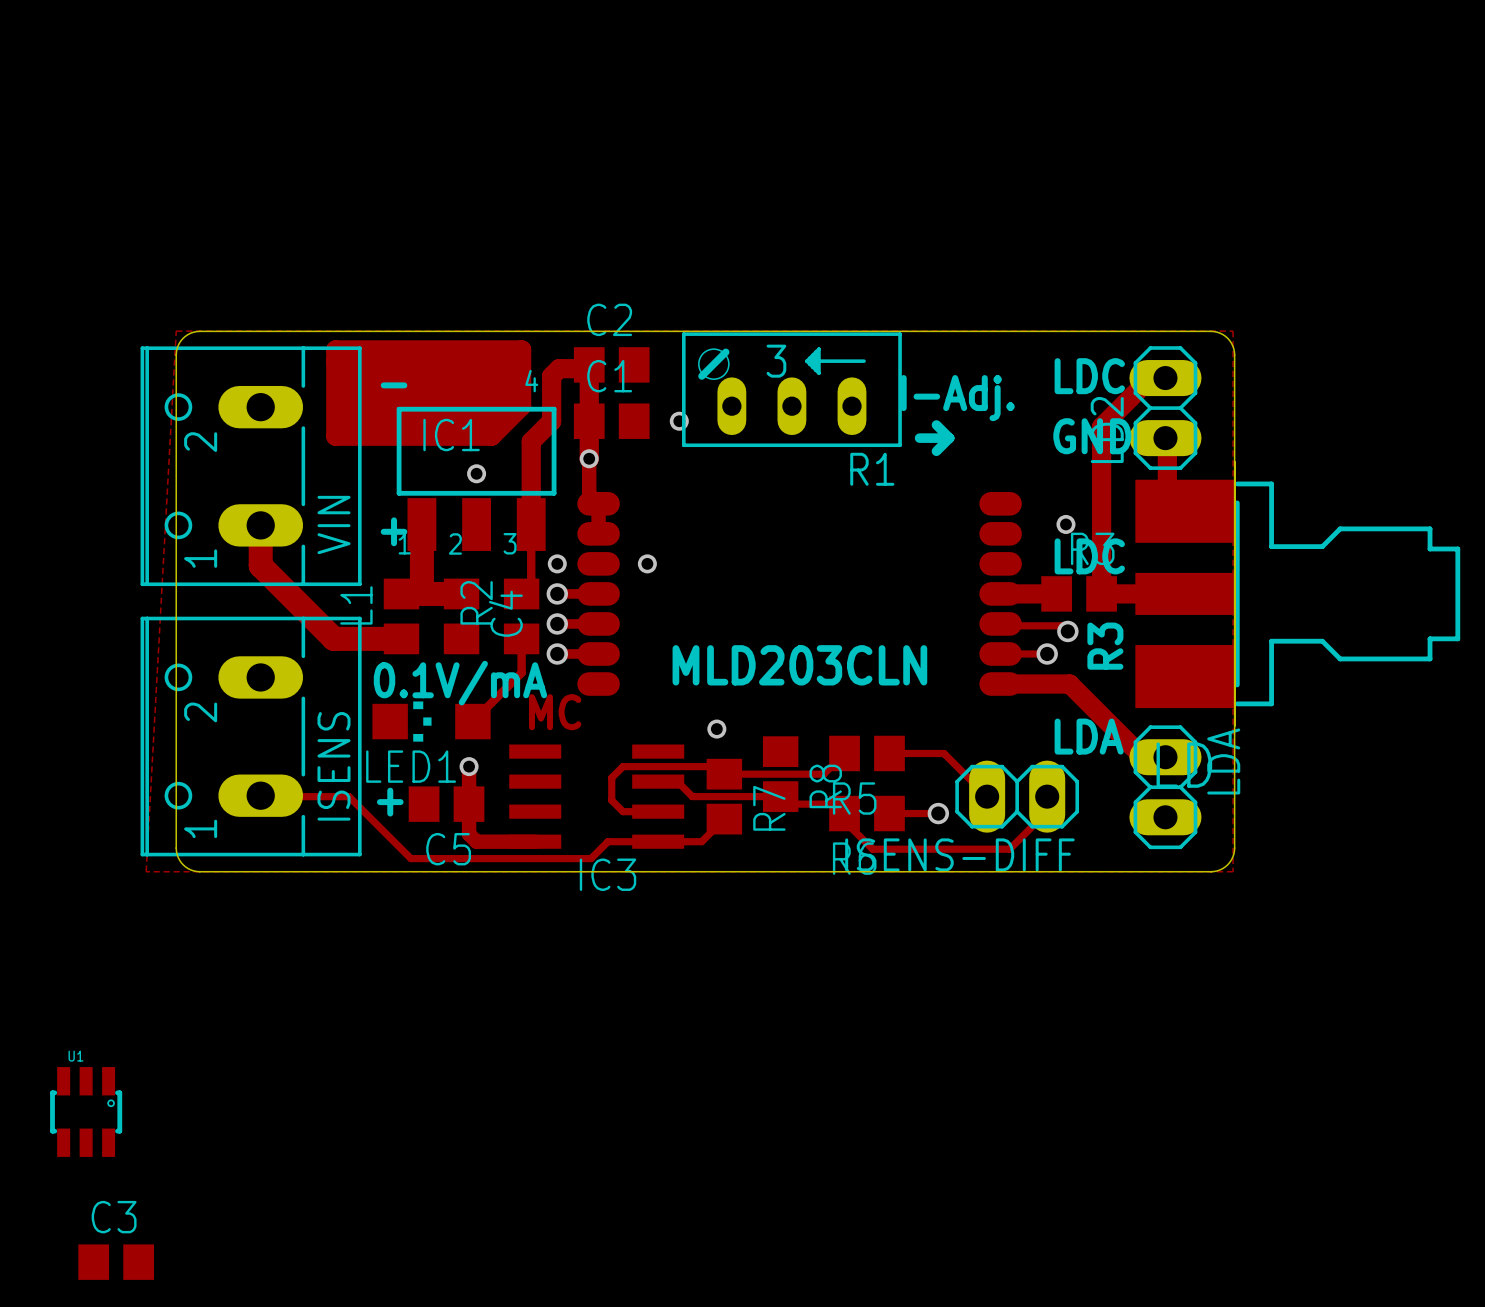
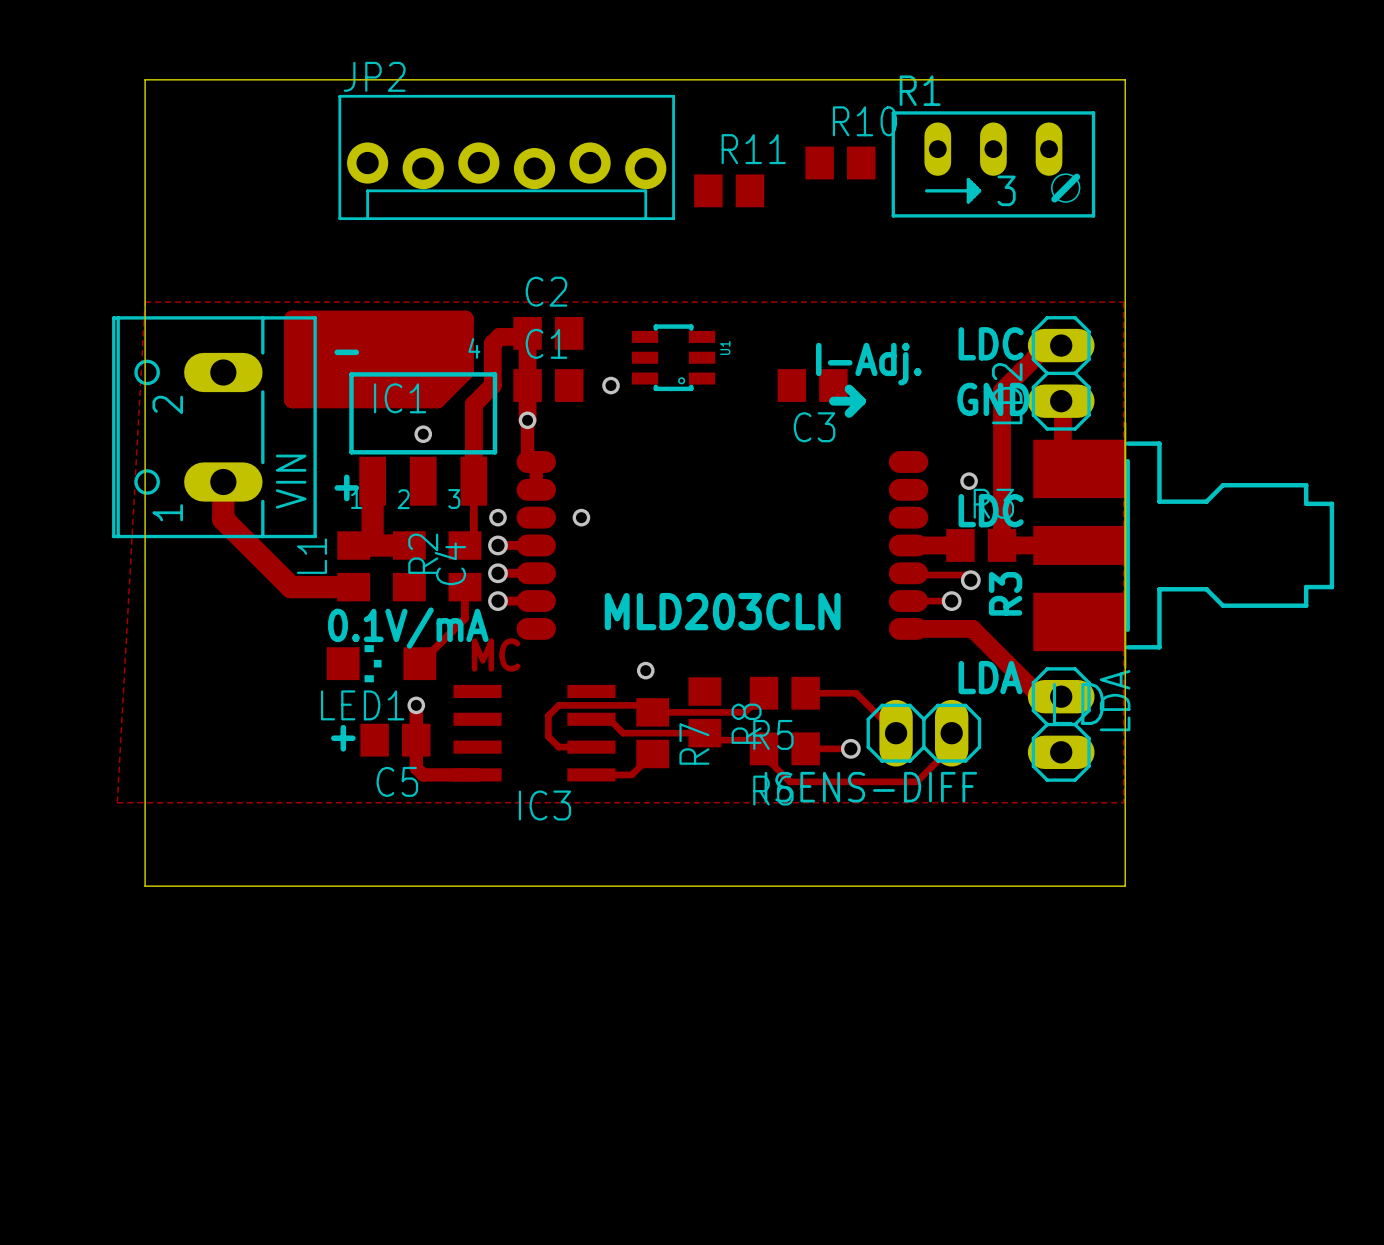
JP2: none -> (506, 157)
R10: none -> (840, 163)
R11: none -> (729, 190)
R1 footprint: [682, 332, 902, 448] -> [891, 111, 1096, 218]
board edge: (176, 355) (178, 345) (183, 338) (190, 333) (199, 331) (1210, 331) (1220, 333) (1227, 338) (1232, 345) (1234, 355) -> (145, 324) (145, 79) (1125, 79) (1125, 324)
R1 name position: R1 (872, 469) -> R1 (920, 90)
ISENS: (251, 736) -> none
track: (260, 795) (348, 796) (410, 858) (591, 858) (607, 841) (658, 841) -> none
board edge: (176, 848) (178, 857) (183, 864) (190, 869) (199, 871) (1210, 871) (1220, 869) (1227, 864) (1232, 857) (1234, 848) -> (145, 780) (145, 886) (1125, 886) (1125, 780)
U1 rotation: 0° (86, 1111) -> 90° clockwise (673, 357)
U1 position: (86, 1111) -> (673, 357)
C3 name position: C3 (114, 1217) -> C3 (814, 427)
C3 position: (116, 1262) -> (812, 385)

